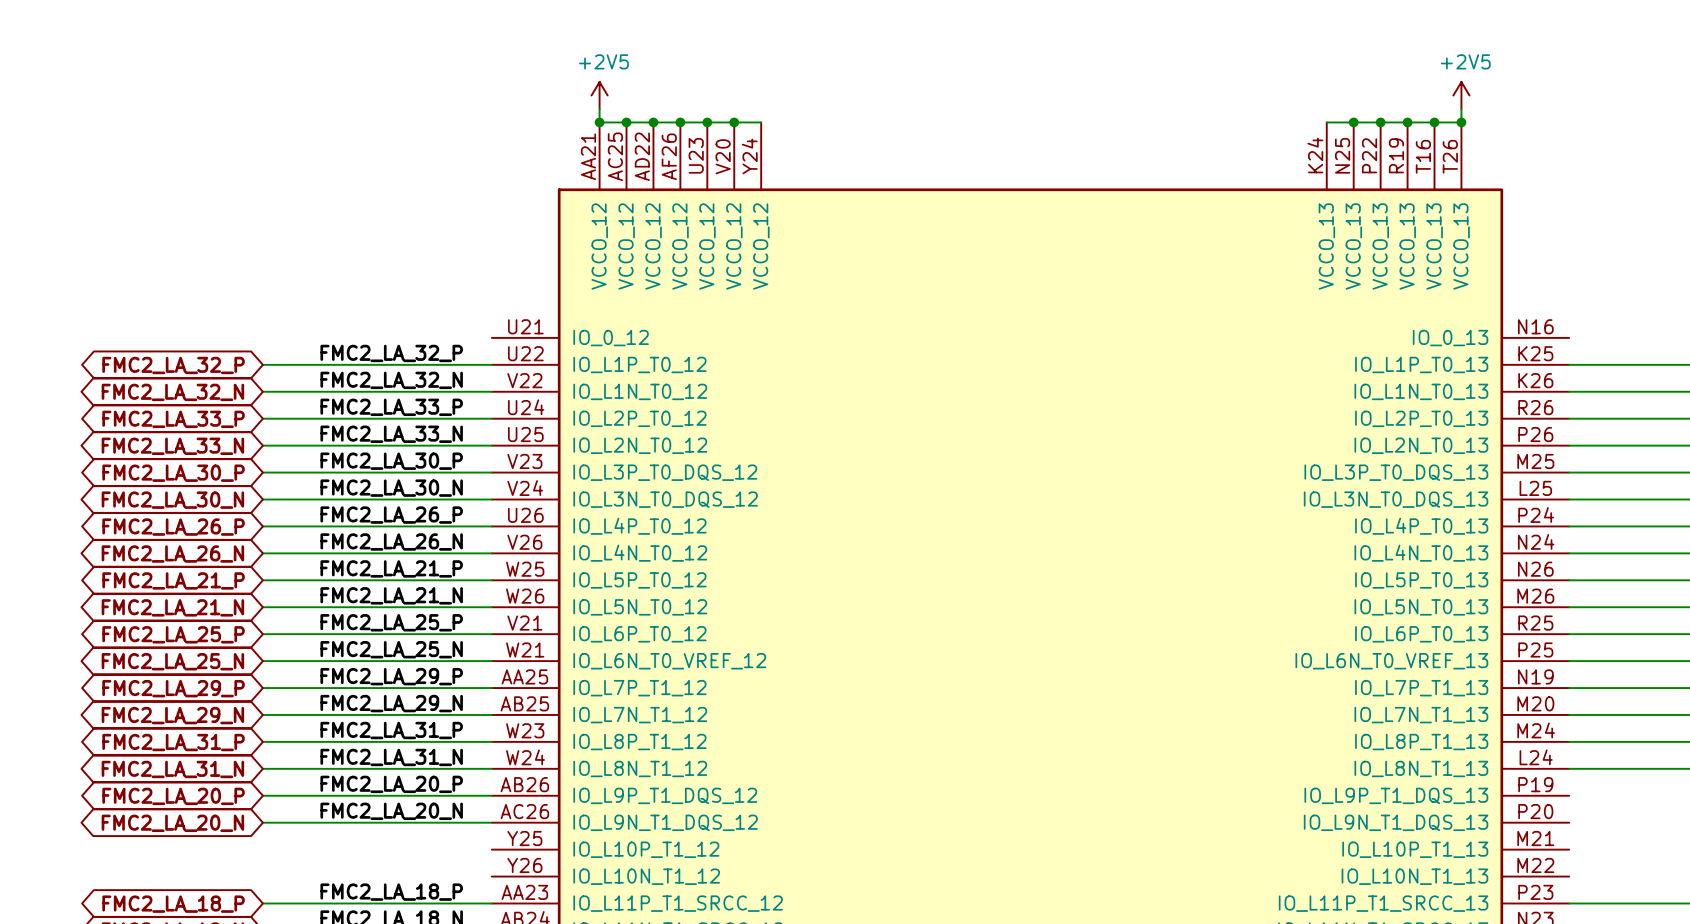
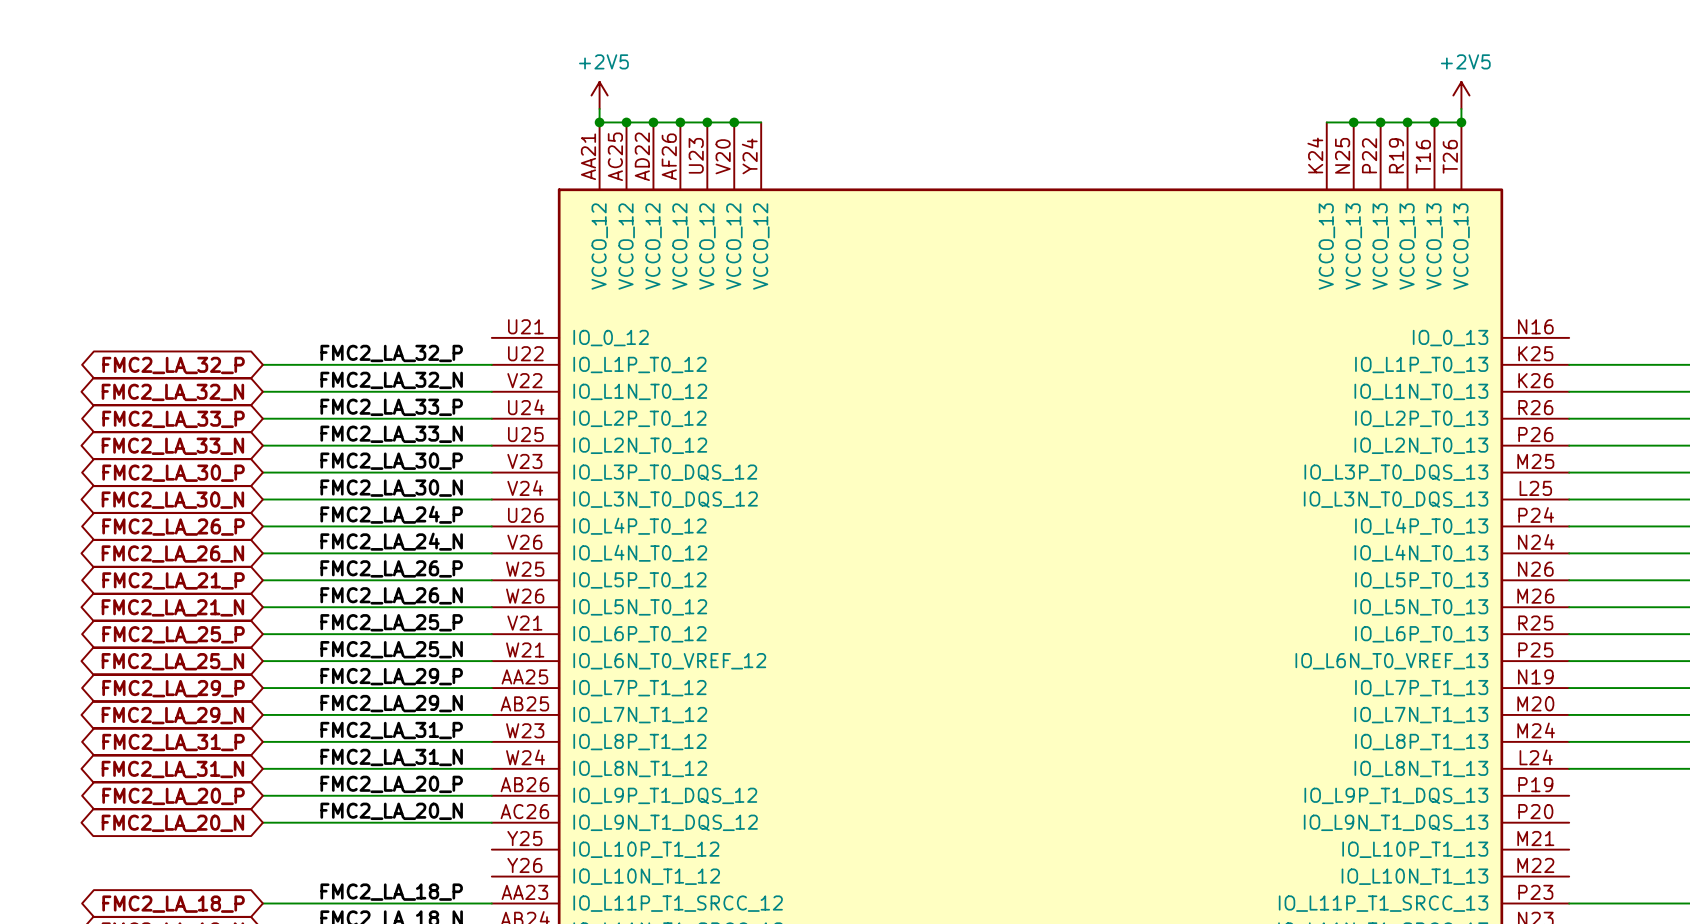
label: FMC2_LA_26_P (391, 515) -> FMC2_LA_24_P (391, 514)
label: FMC2_LA_26_N (391, 541) -> FMC2_LA_24_N (391, 541)
label: FMC2_LA_21_P (391, 568) -> FMC2_LA_26_P (391, 568)
label: FMC2_LA_21_N (391, 595) -> FMC2_LA_26_N (391, 595)

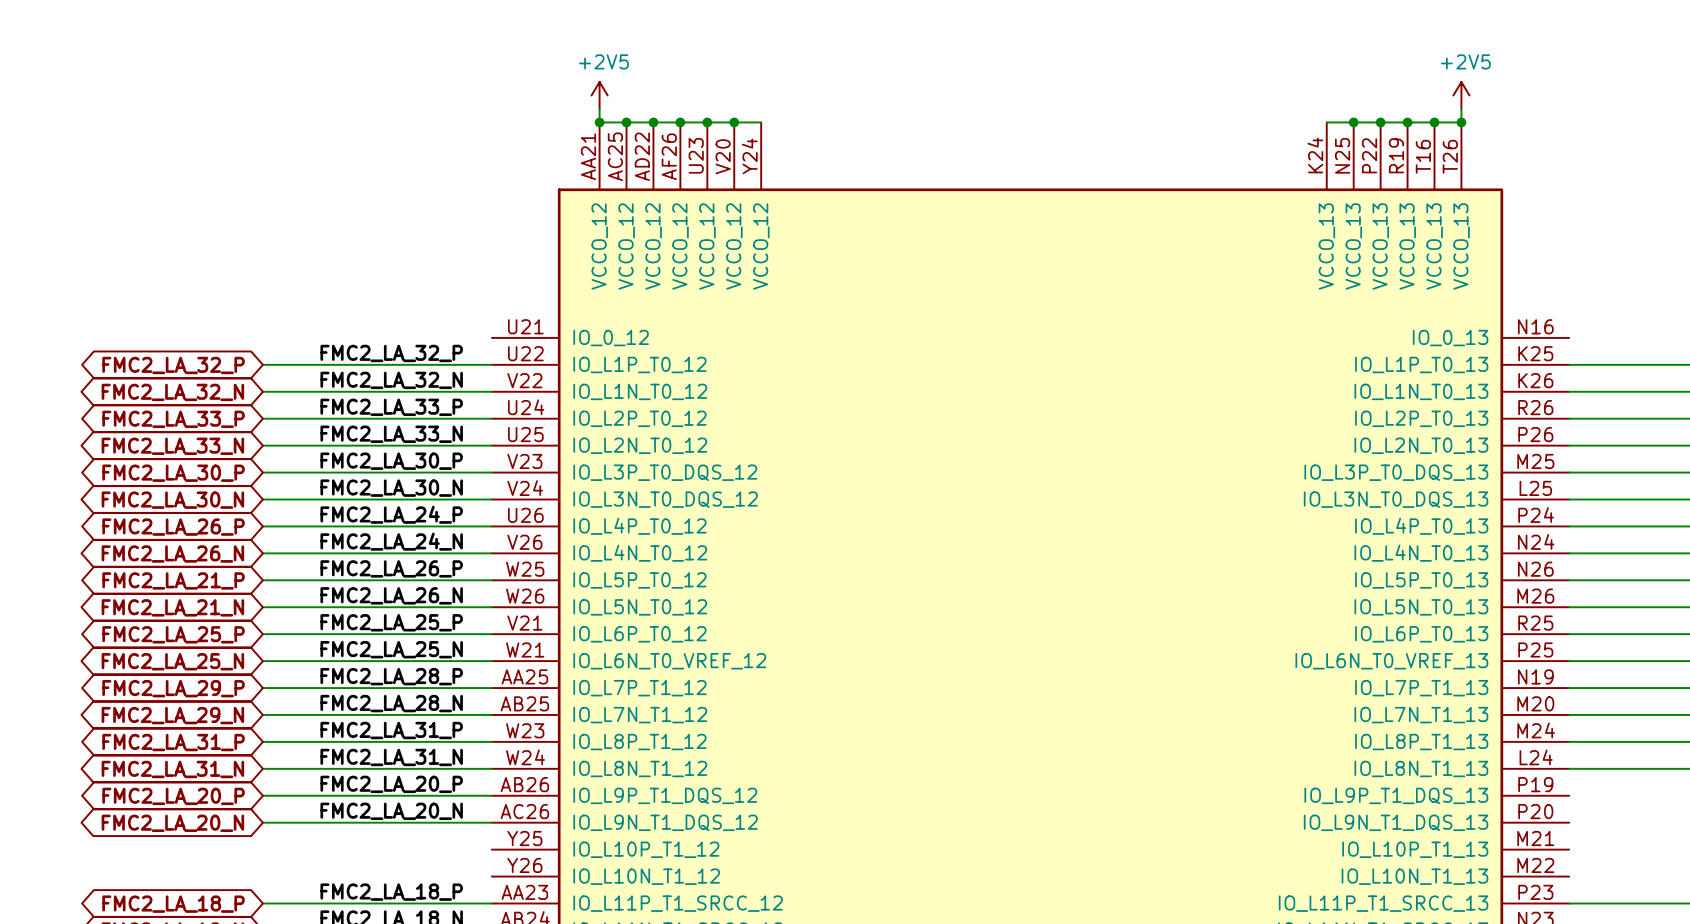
label: FMC2_LA_29_P (391, 676) -> FMC2_LA_28_P (391, 676)
label: FMC2_LA_29_N (391, 703) -> FMC2_LA_28_N (391, 703)

